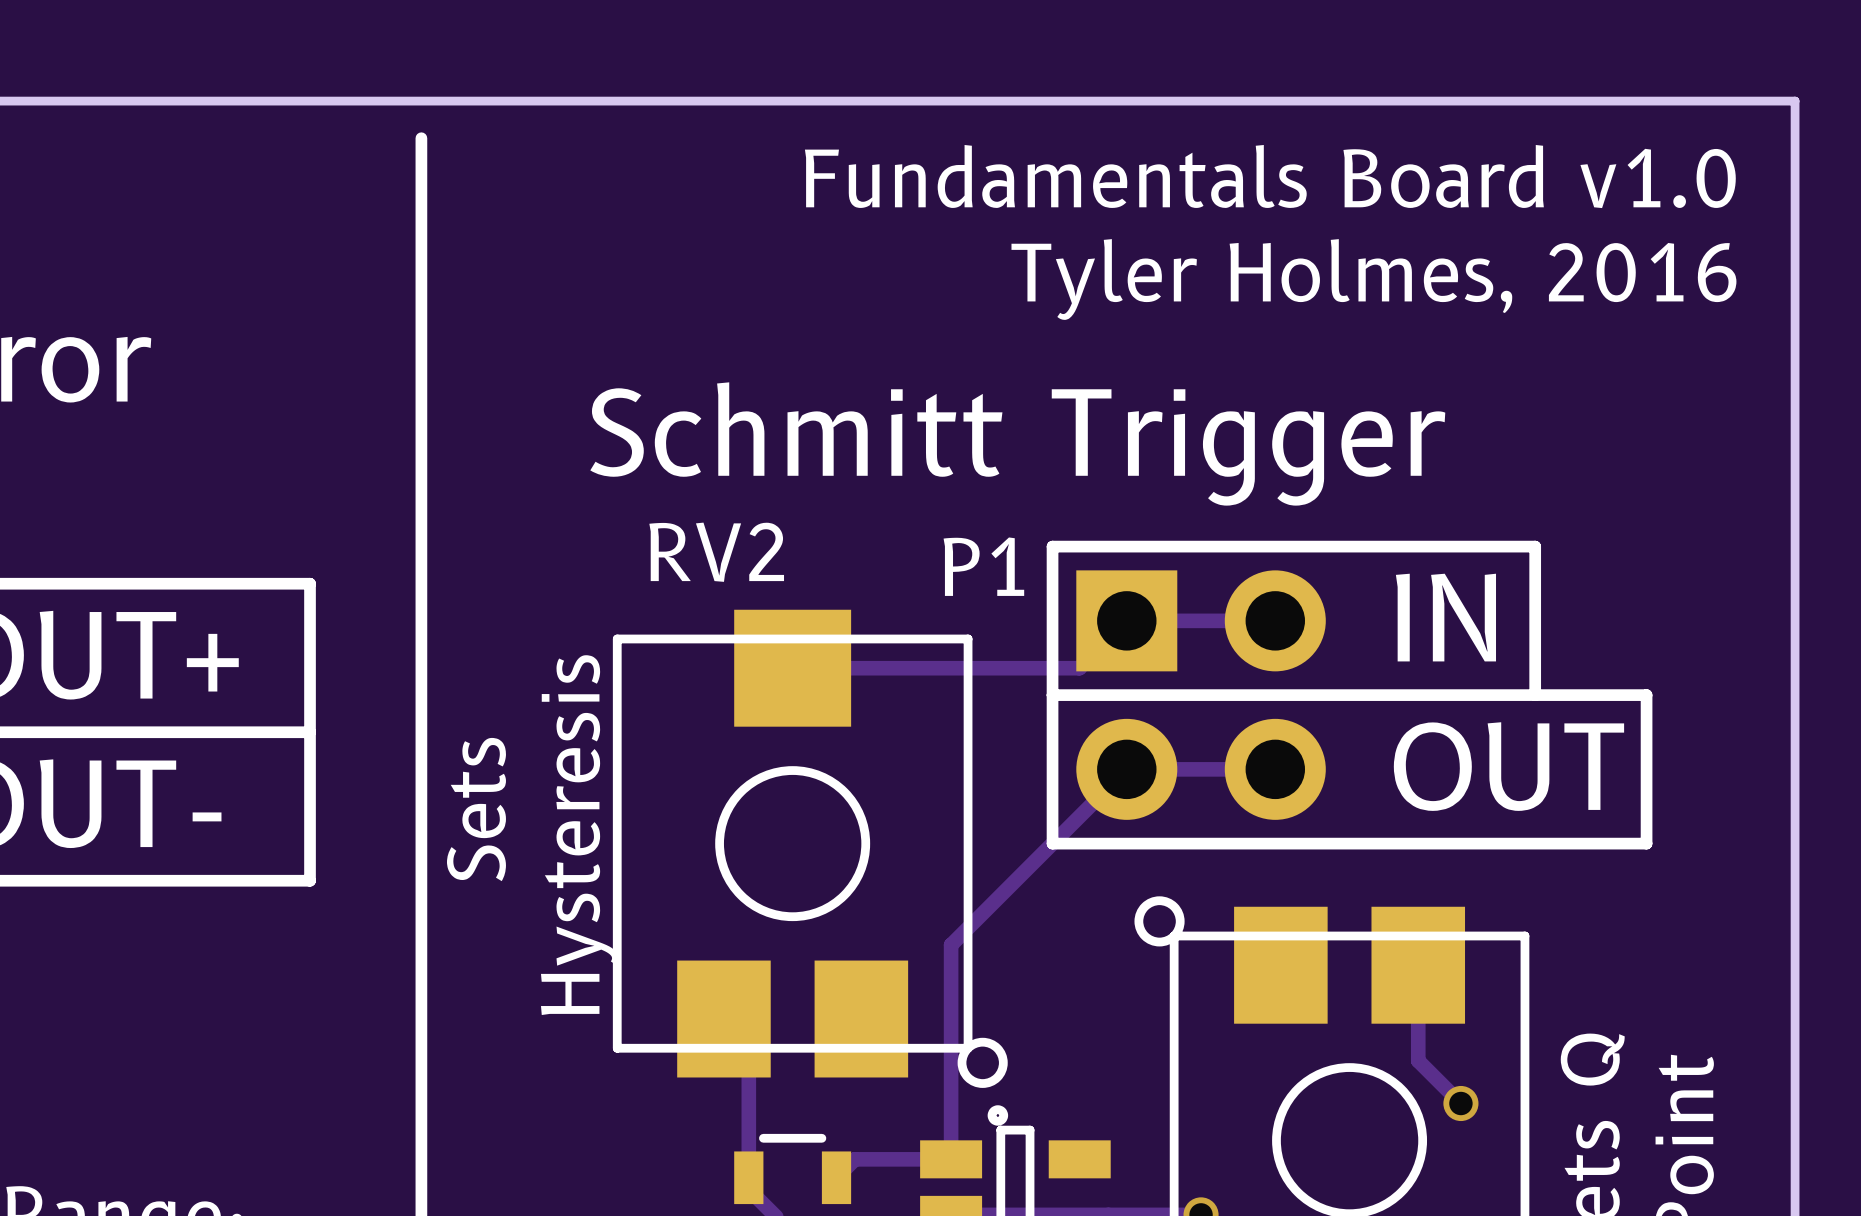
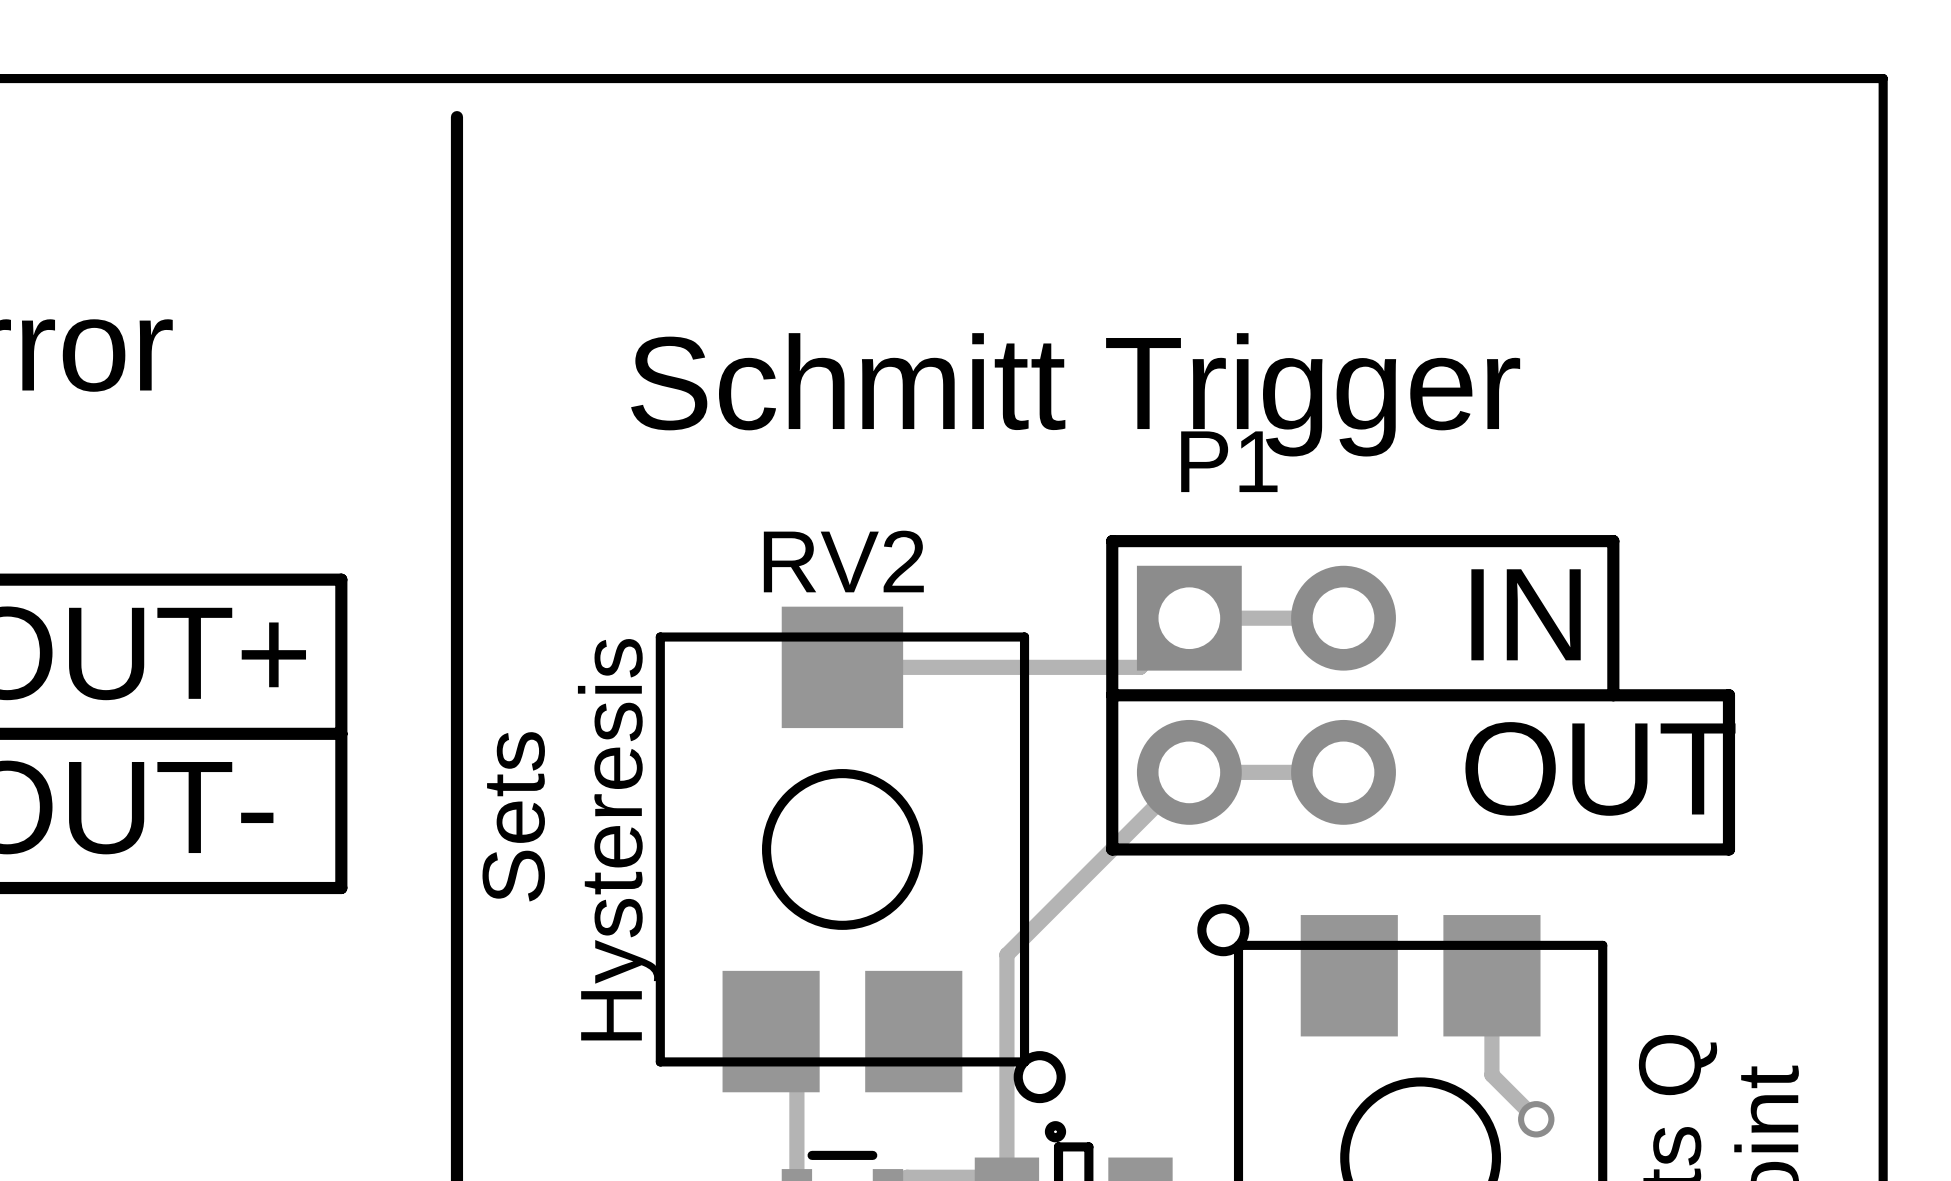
text: Fundamentals Board v1.0 (1270, 176) -> none
text: Tyler Holmes, 2016 (1373, 279) -> none
text position: Schmitt Trigger (1017, 443) -> Schmitt Trigger (1075, 394)
RV2 name position: RV2 (716, 552) -> RV2 (843, 561)
P1 name position: P1 (983, 566) -> P1 (1229, 461)

